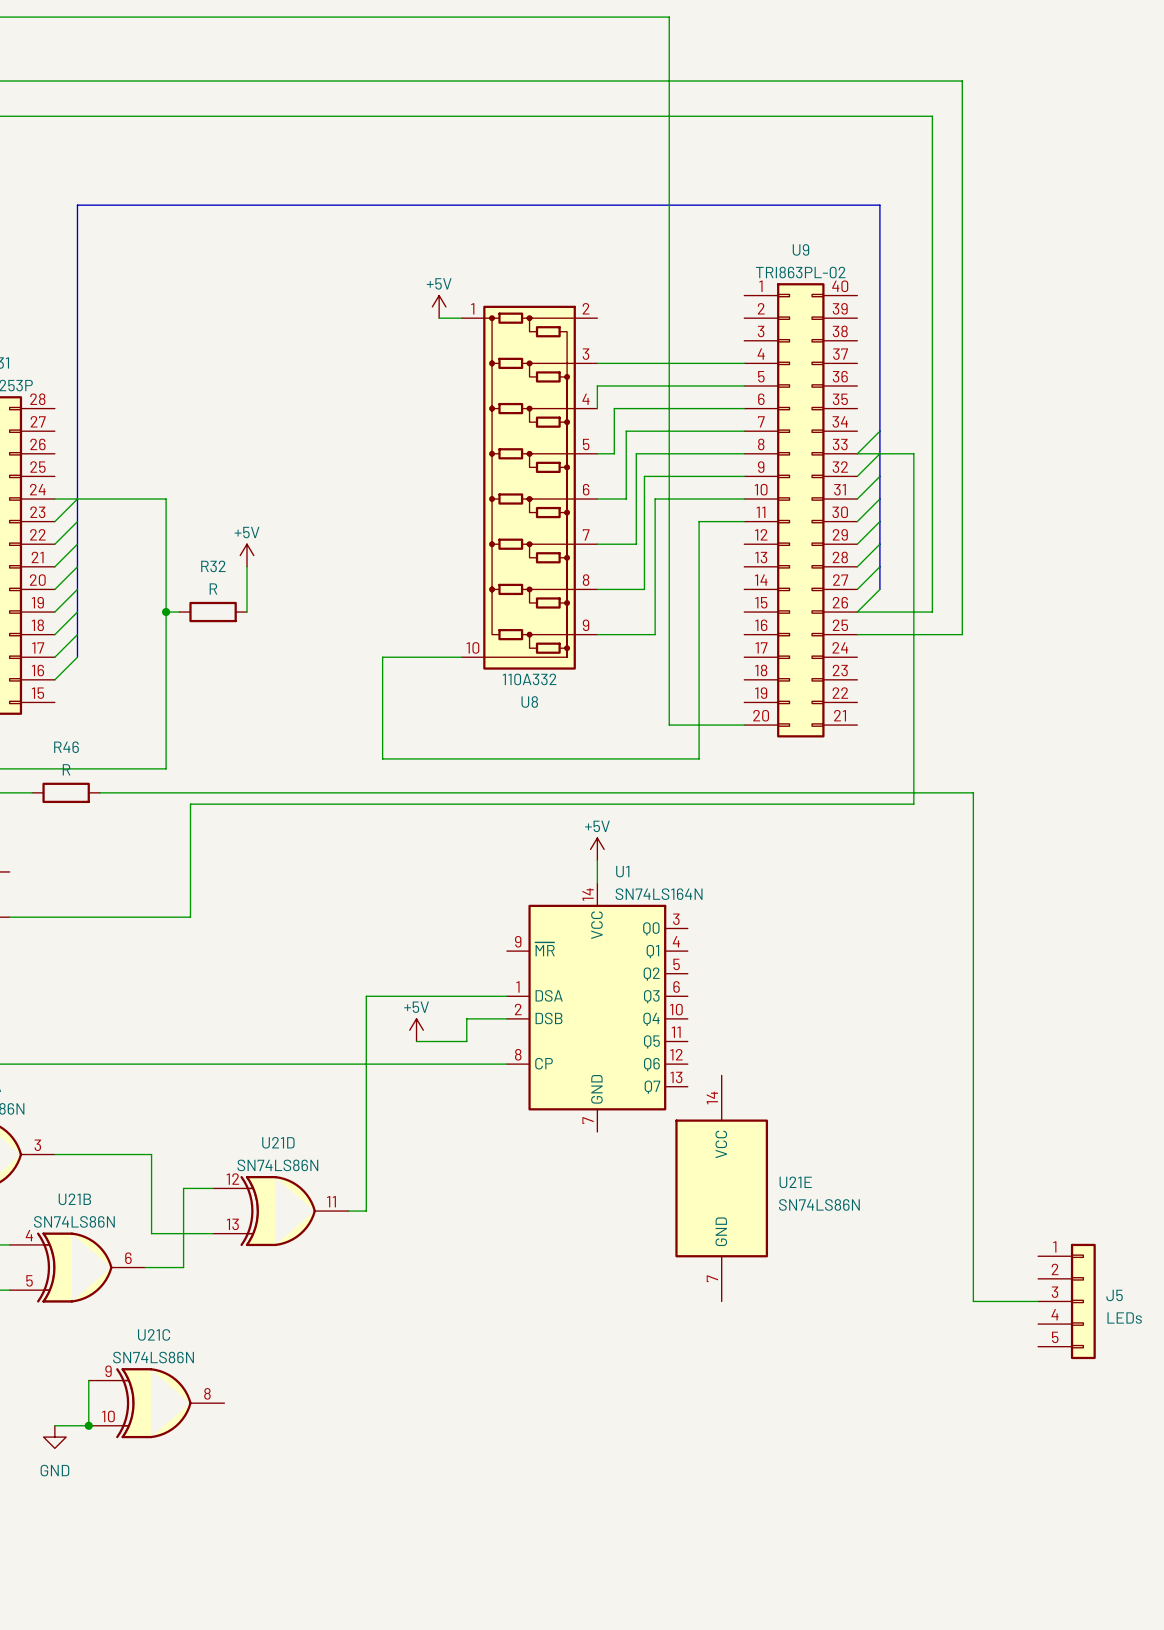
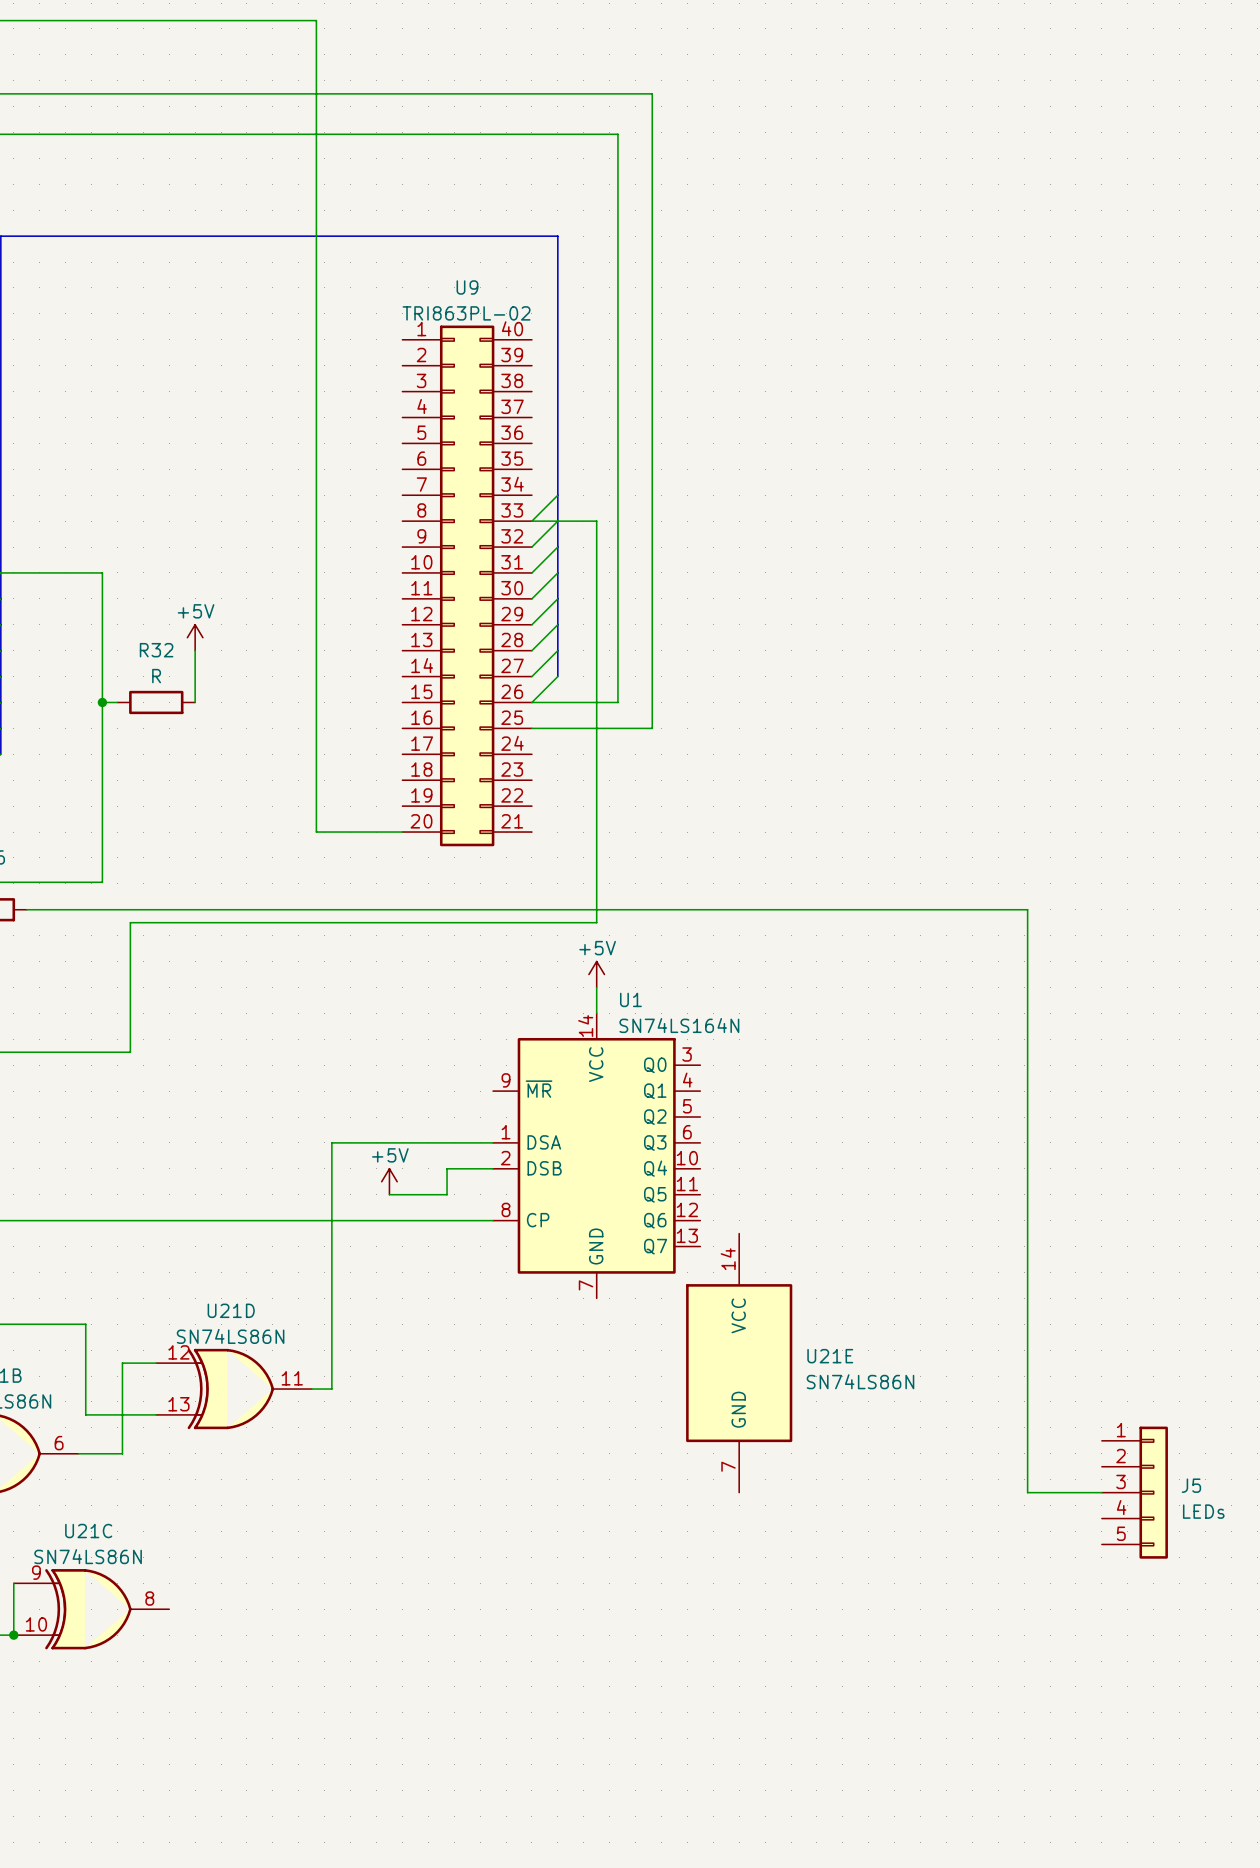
wire: (352, 17) (669, 17) (669, 725) (744, 725) -> (316, 20) (316, 832) (402, 832)
wire: (645, 81) (962, 81) (962, 634) (857, 634) -> (652, 93) (652, 728)
wire: (615, 116) (932, 116) (932, 612) (857, 612) (879, 589) -> (617, 134) (617, 702) (531, 702) (557, 676)
bus: (563, 205) (879, 205) (879, 589) -> (557, 236) (557, 676)
power symbol: +5V (439, 306) -> none
wire: (597, 363) (744, 363) -> none
wire: (744, 385) (597, 385) (597, 408) -> none
wire: (744, 408) (614, 408) (614, 453) (597, 453) -> none
wire: (744, 431) (626, 431) (626, 499) (597, 499) -> none
wire: (879, 431) (857, 453) (913, 453) (913, 804) (597, 804) -> (557, 495) (531, 521) (596, 521) (596, 922)
wire: (744, 453) (636, 453) (636, 544) (597, 544) -> none
wire: (879, 453) (857, 476) -> none
wire: (744, 476) (644, 476) (644, 589) (597, 589) -> none
wire: (879, 476) (857, 499) -> none
U8: 110A332 (529, 487) -> none
wire: (744, 499) (655, 499) (655, 634) (645, 634) -> none
wire: (879, 499) (857, 521) -> none
U9 position: (800, 510) -> (467, 585)
wire: (744, 521) (699, 521) (699, 758) (382, 758) (382, 657) (461, 657) -> none
wire: (879, 521) (857, 544) -> none
wire: (879, 544) (857, 566) -> none
wire: (879, 566) (857, 589) -> none

